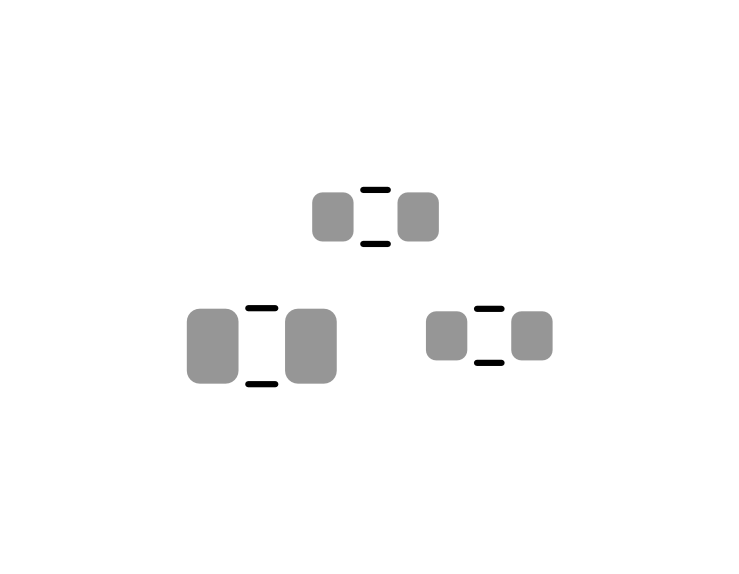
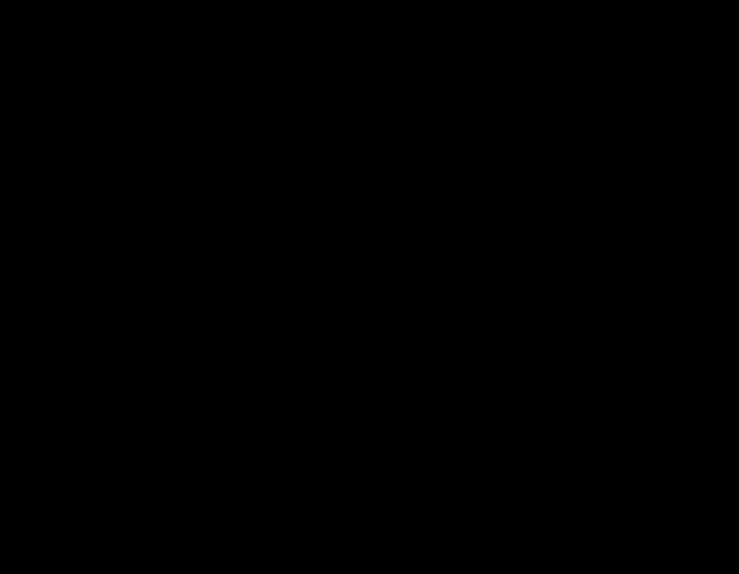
part: (375, 216) -> none
part: (489, 335) -> none
part: (261, 346) -> none

